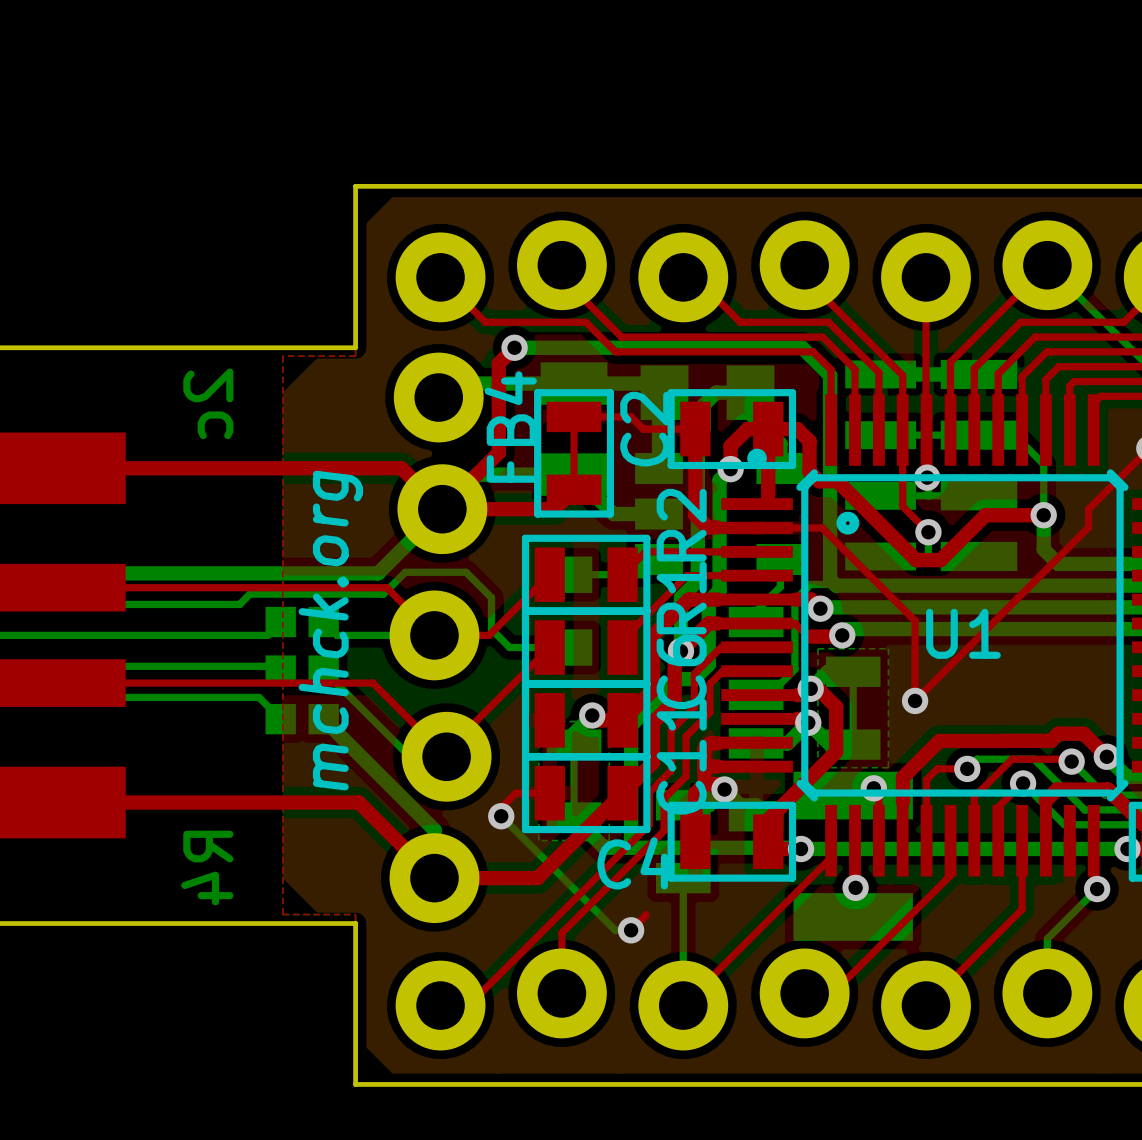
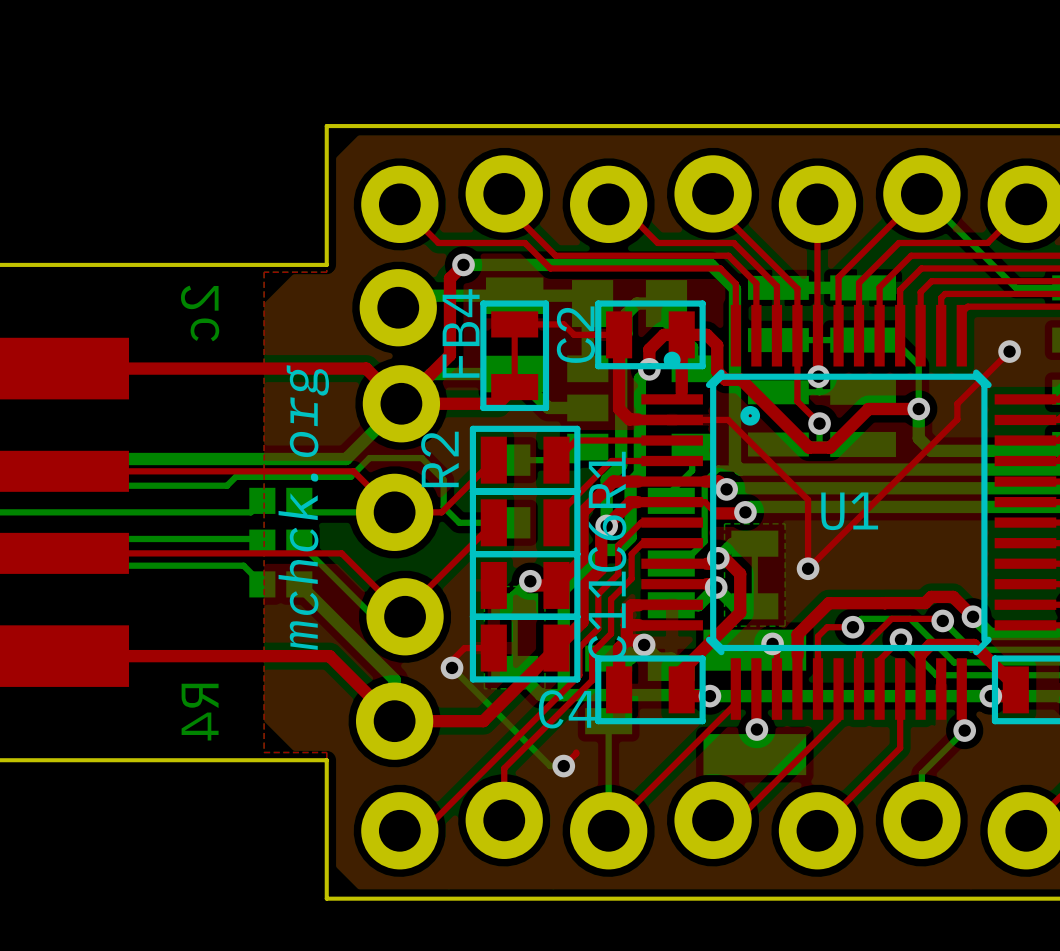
R2 name position: R2 (681, 525) -> R2 (439, 459)

